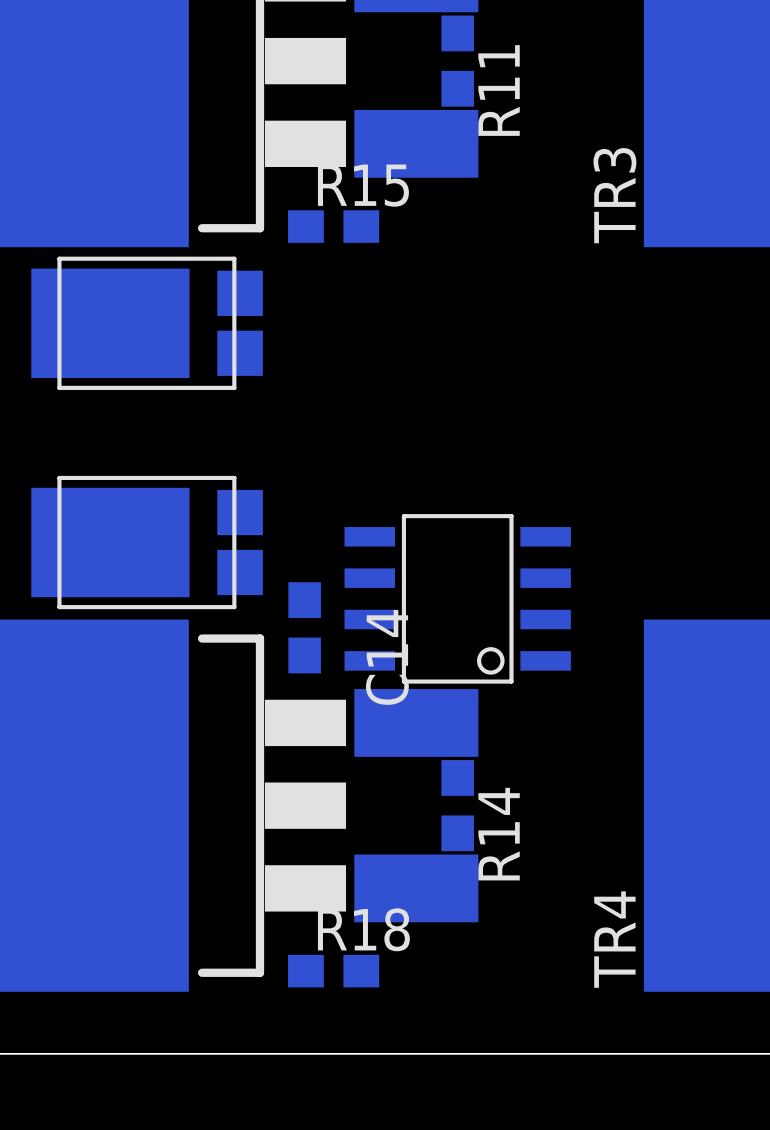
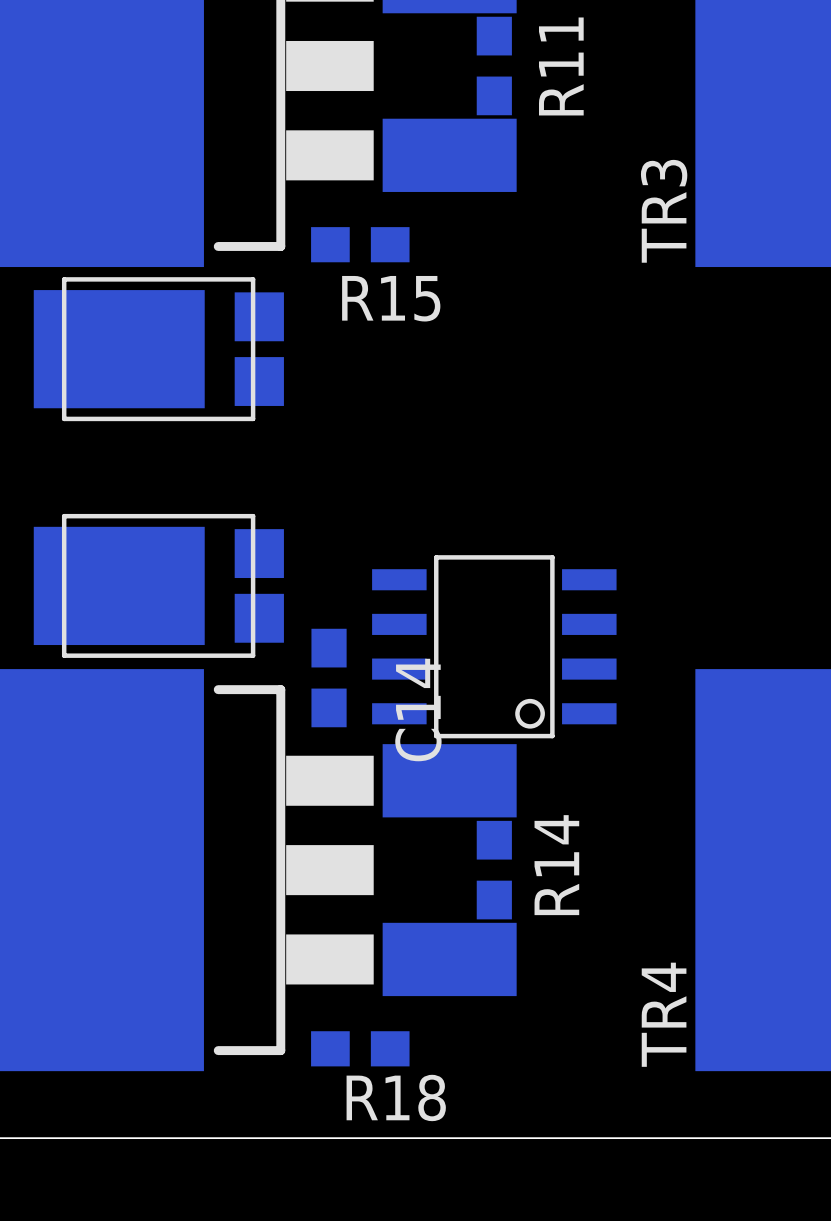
R11 name position: R11 (499, 90) -> R11 (561, 66)
R15 name position: R15 (363, 185) -> R15 (391, 298)
R14 name position: R14 (499, 834) -> R14 (556, 865)
R18 name position: R18 (363, 929) -> R18 (396, 1097)

